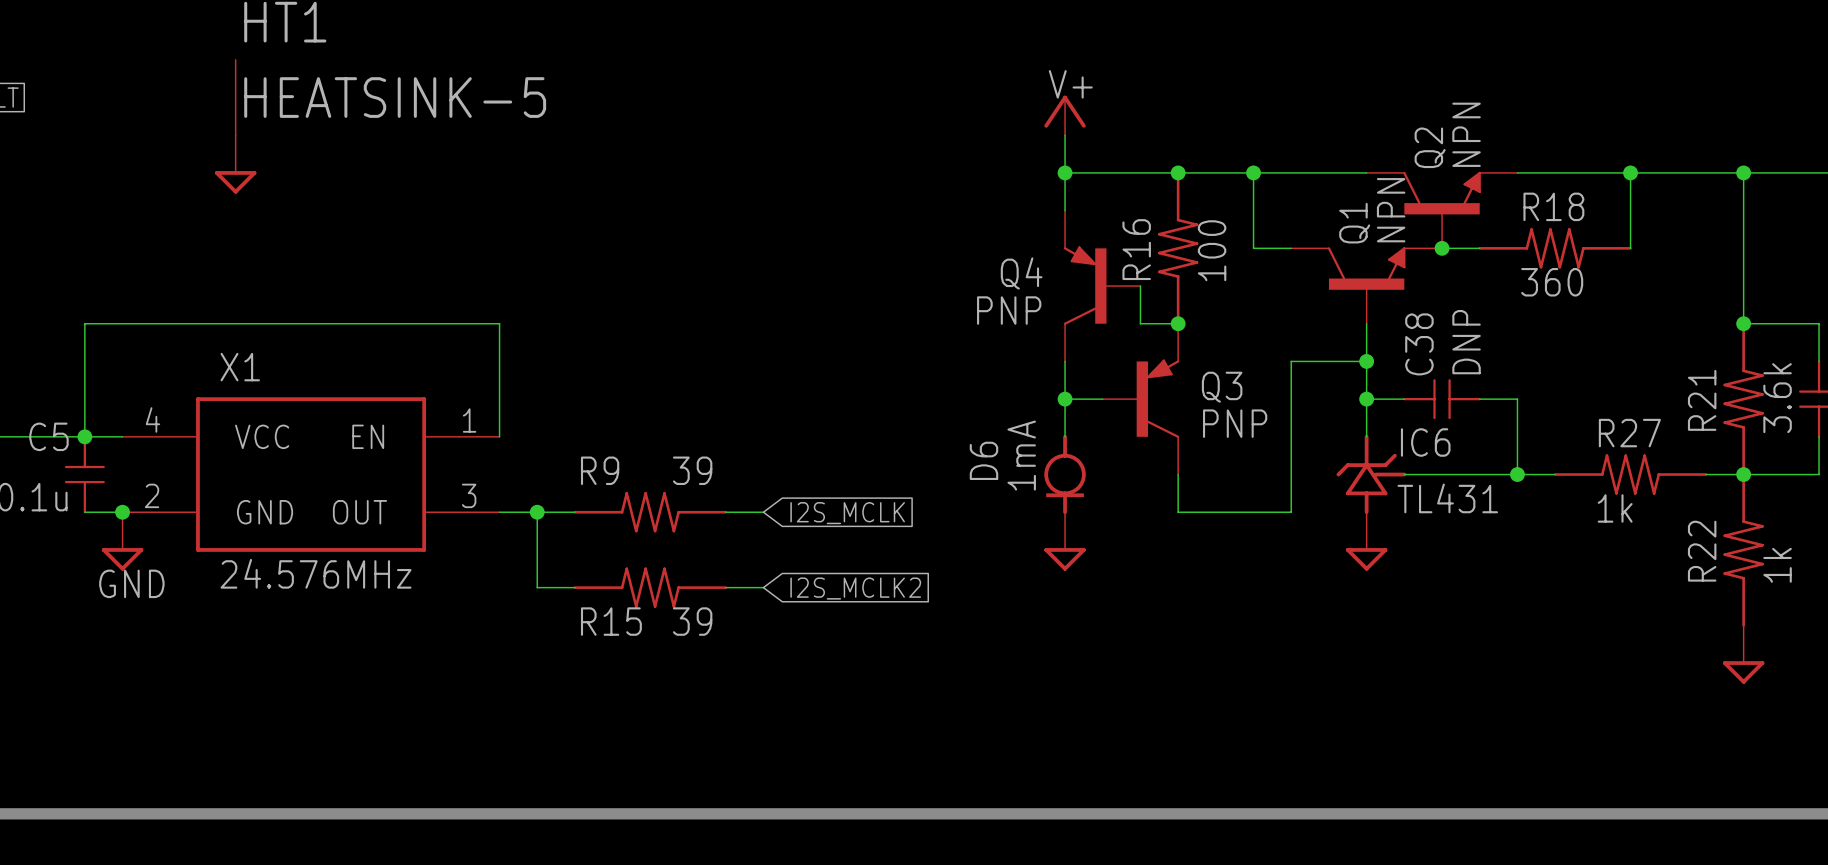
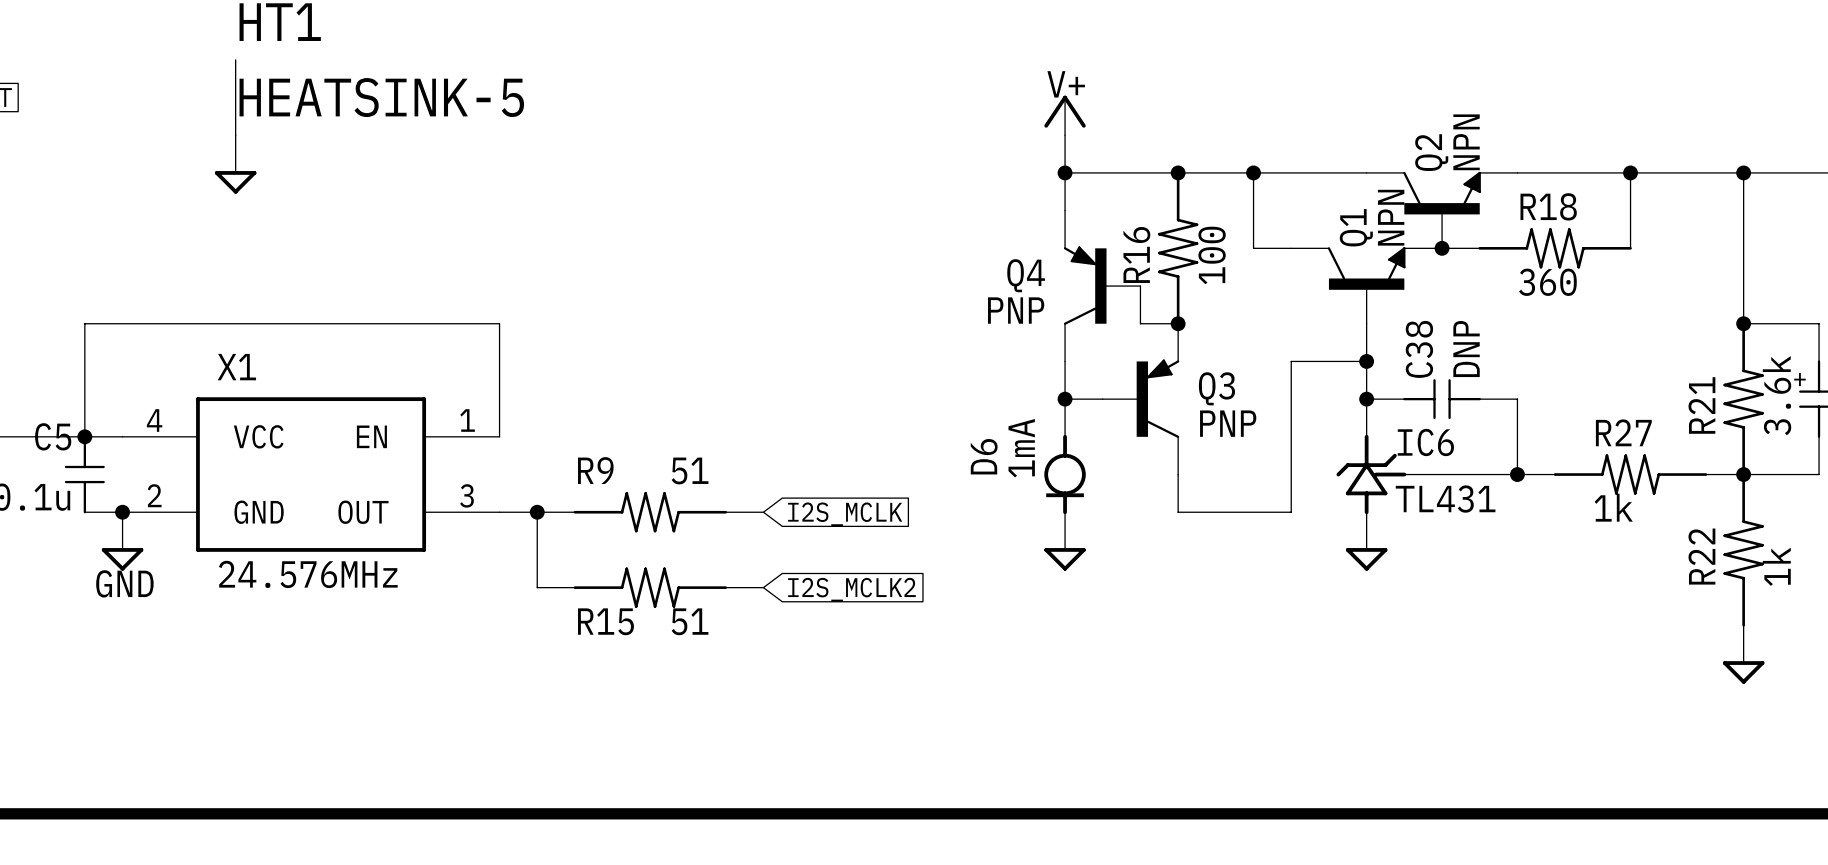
part text: none -> + (1799, 379)
R9 value: 39 (692, 470) -> 51 (690, 470)
R15 value: 39 (692, 621) -> 51 (690, 621)

